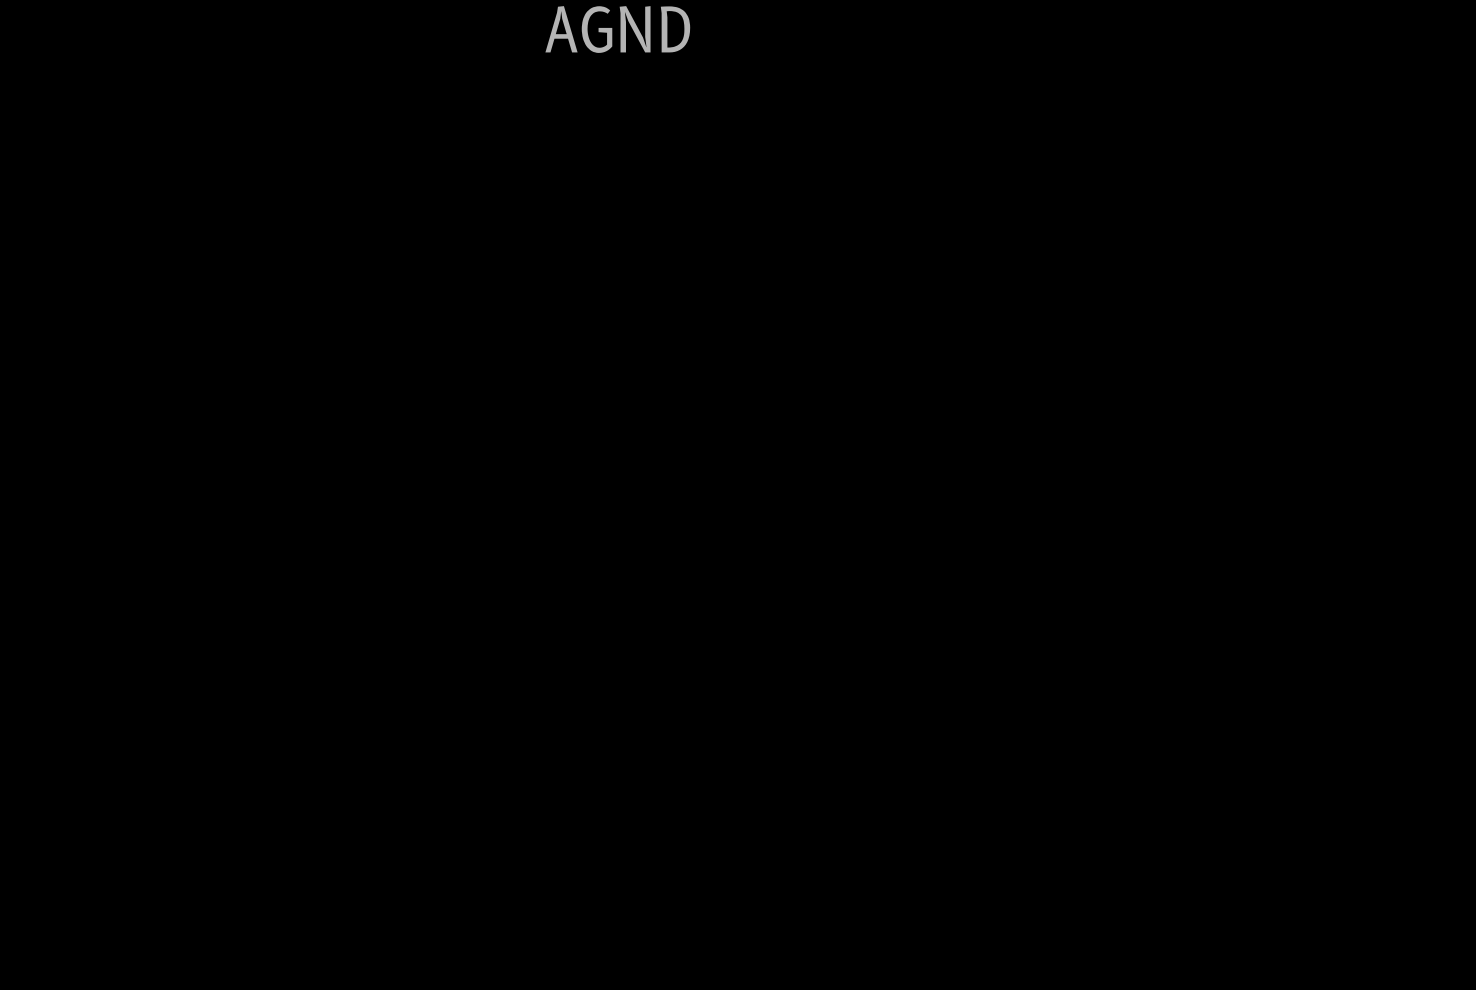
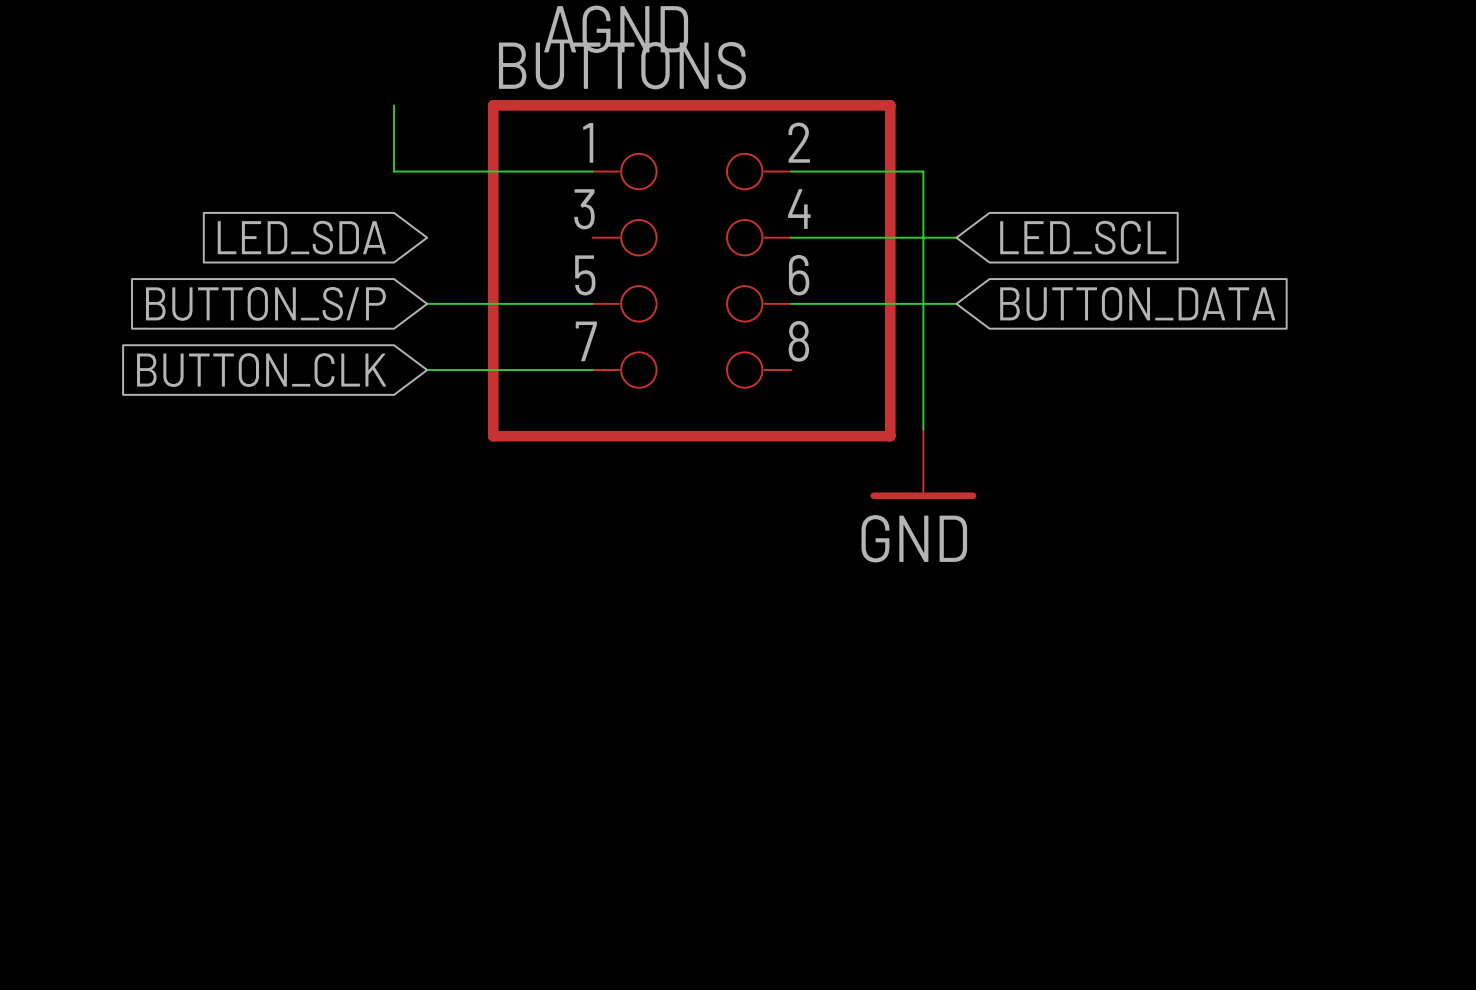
wire: none -> (394, 105) (394, 171) (592, 171)
wire: none -> (791, 171) (923, 171) (923, 429)
wire: none -> (791, 237) (956, 237)
global label: none -> LED_SDA (301, 237)
global label: none -> LED_SCL (1083, 237)
BUTTONS: none -> (691, 270)
wire: none -> (427, 303) (592, 303)
wire: none -> (791, 303) (956, 303)
global label: none -> BUTTON_S/P (265, 303)
global label: none -> BUTTON_DATA (1137, 303)
wire: none -> (427, 370) (592, 370)
global label: none -> BUTTON_CLK (261, 370)
power symbol: none -> GND (923, 464)

